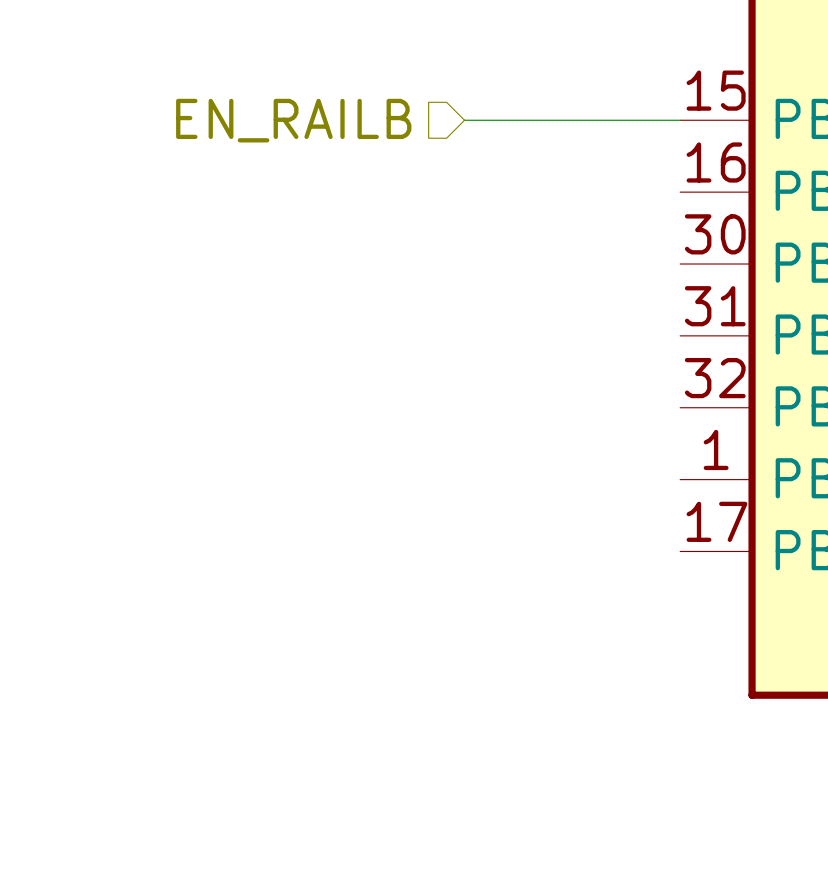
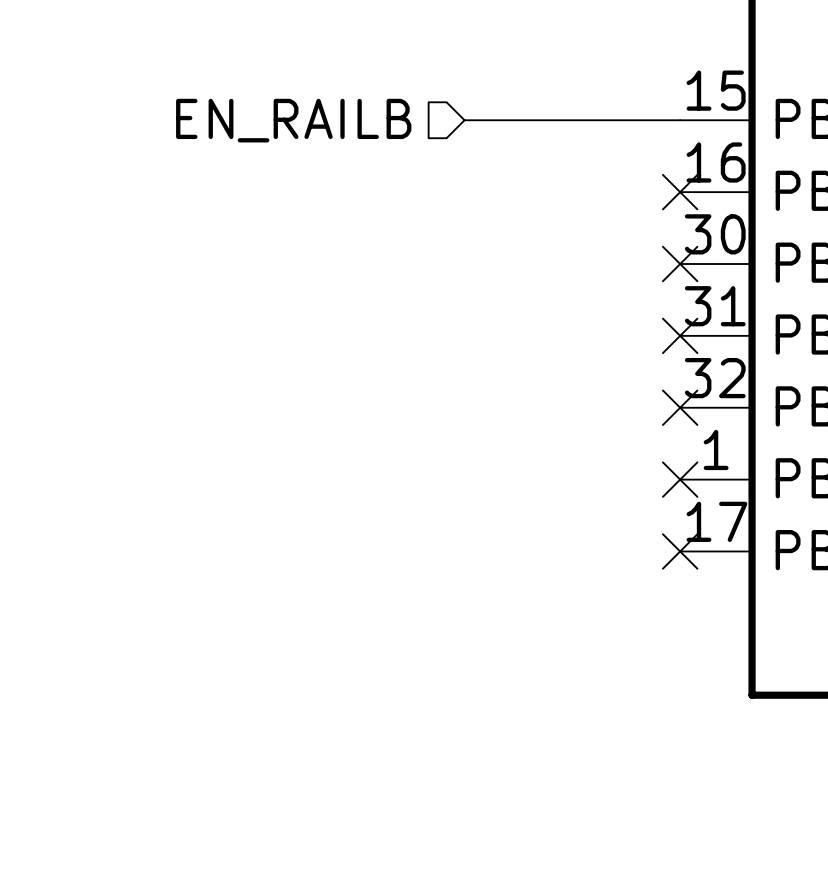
no-connect mark: none -> (680, 192)
no-connect mark: none -> (680, 264)
no-connect mark: none -> (680, 335)
no-connect mark: none -> (680, 407)
no-connect mark: none -> (680, 479)
no-connect mark: none -> (680, 551)

